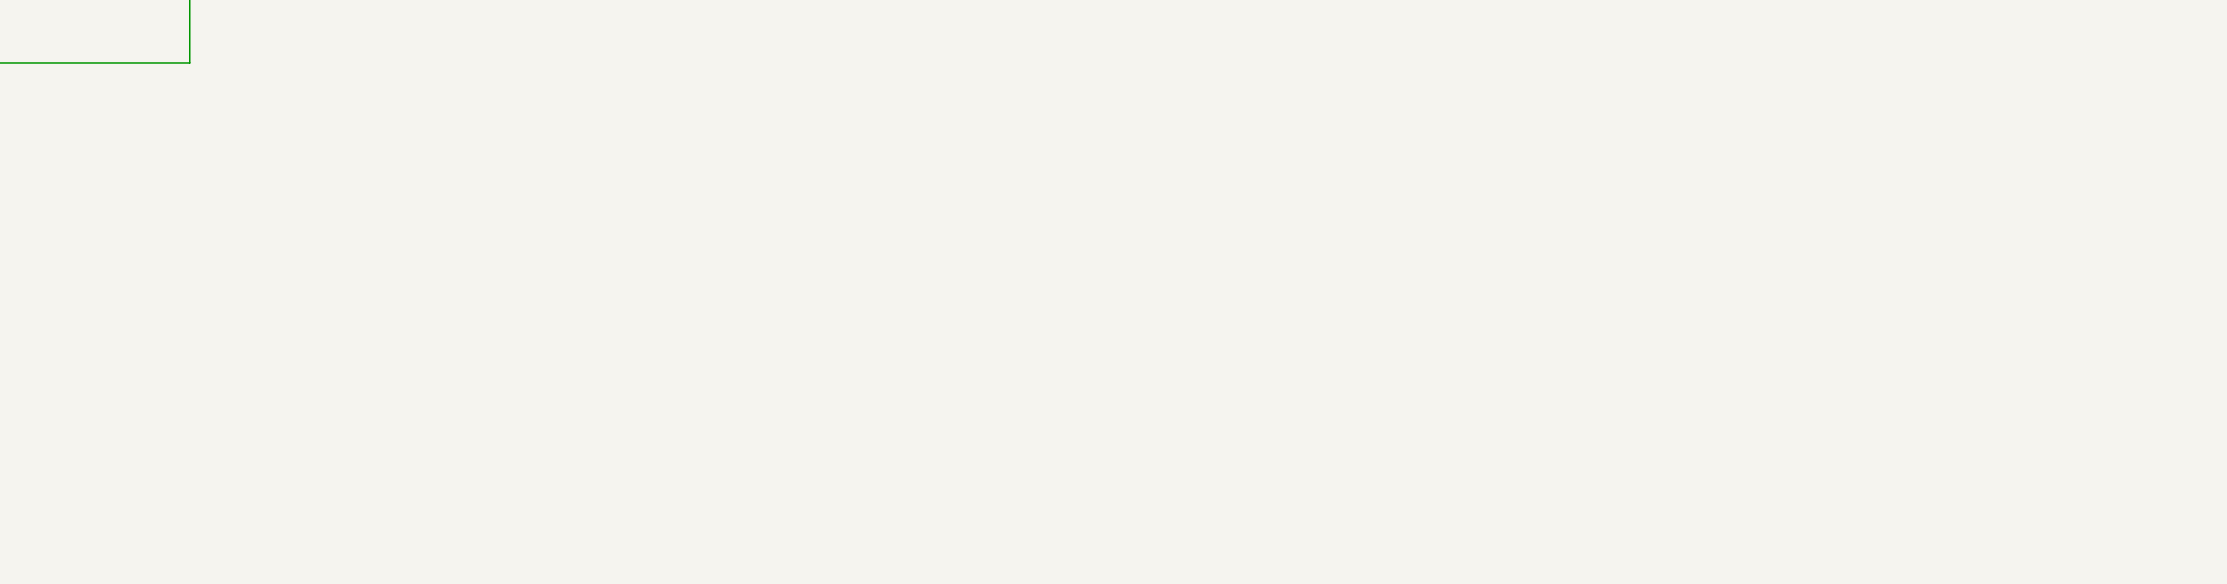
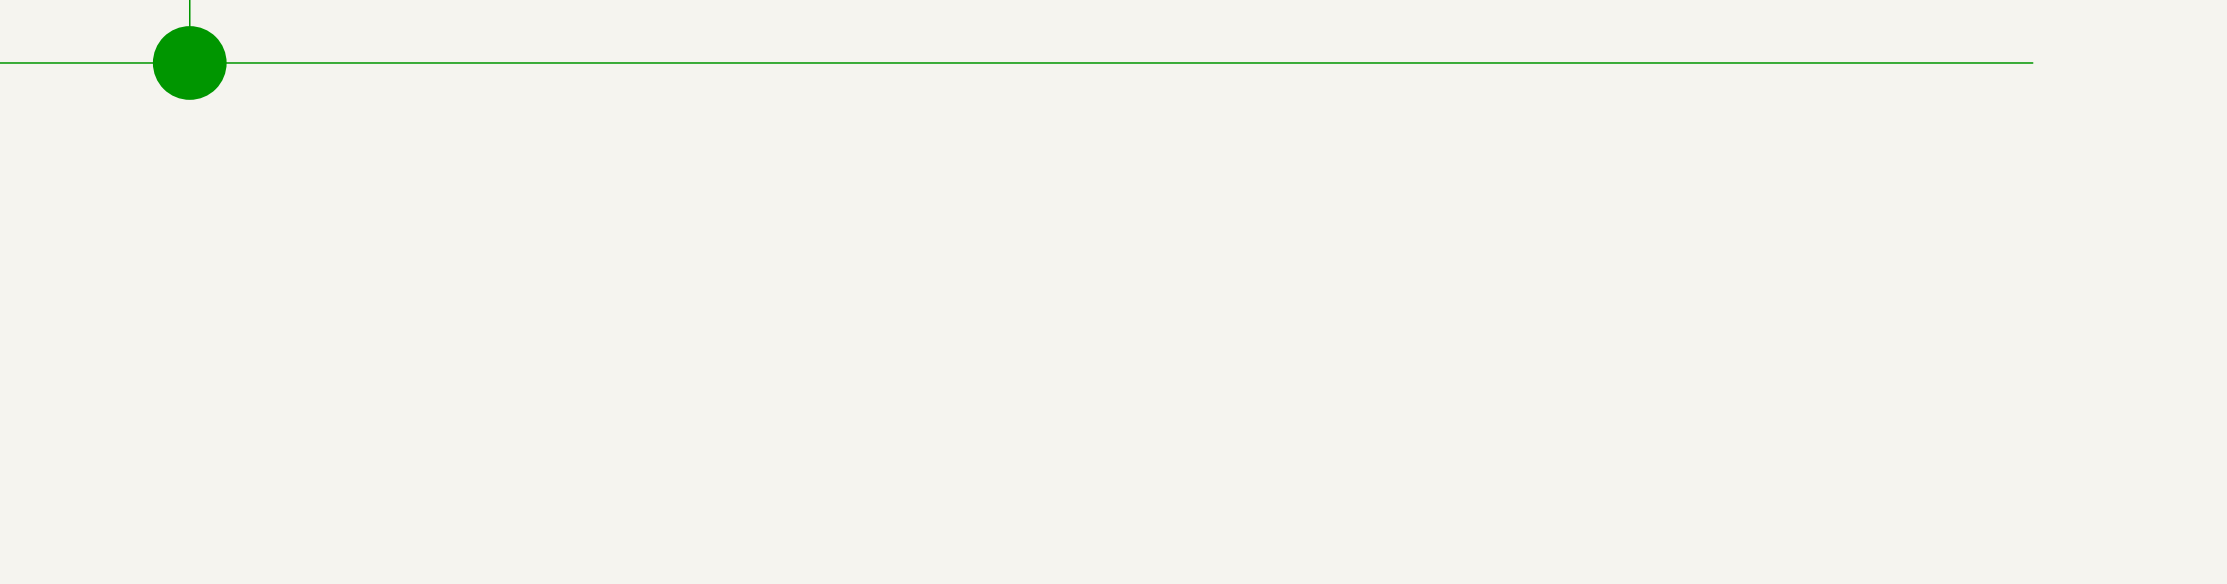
wire: none -> (189, 62) (2032, 62)
junction: none -> (189, 62)

